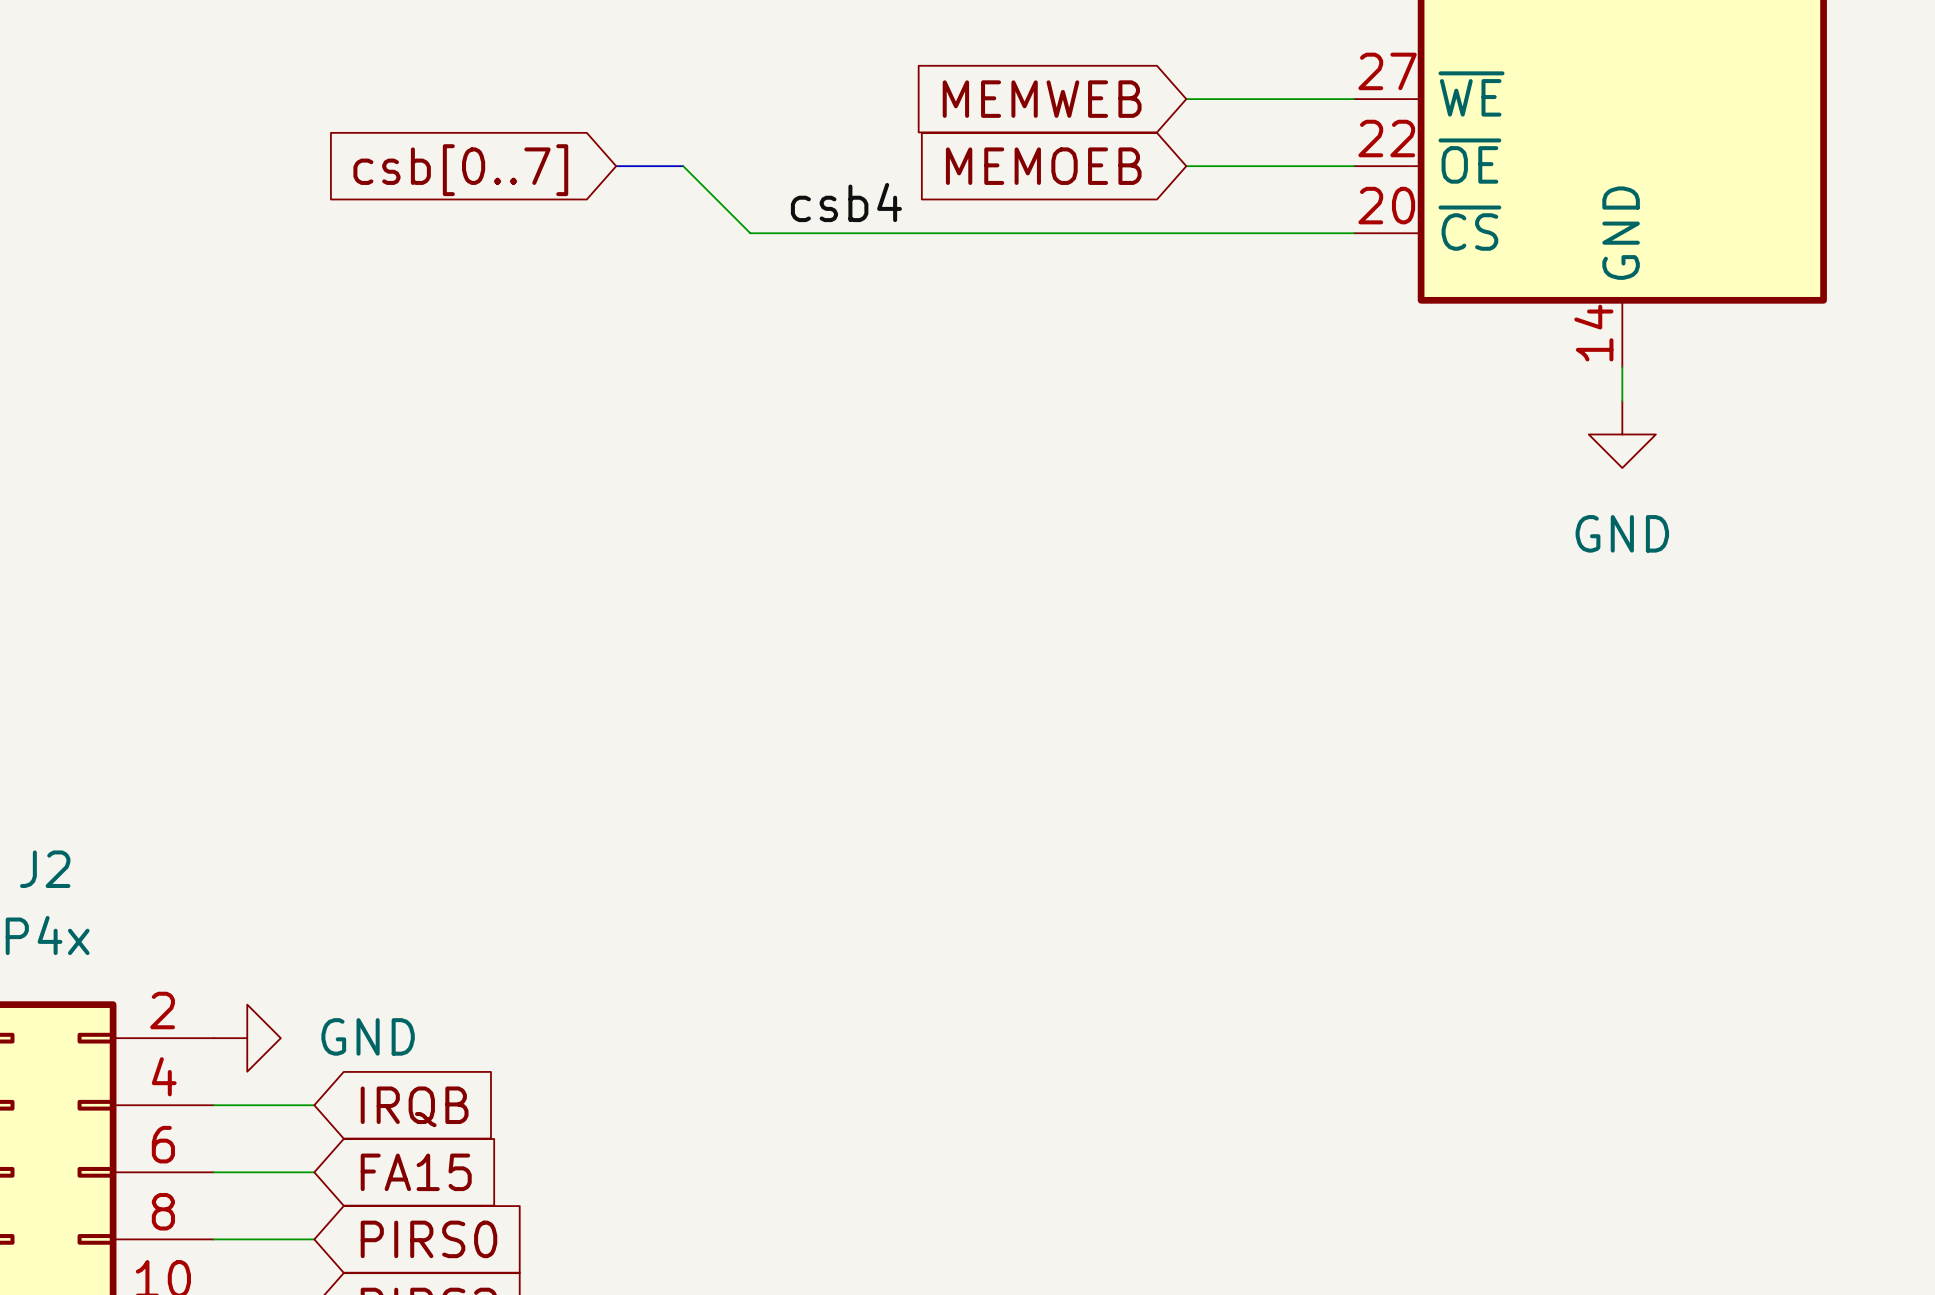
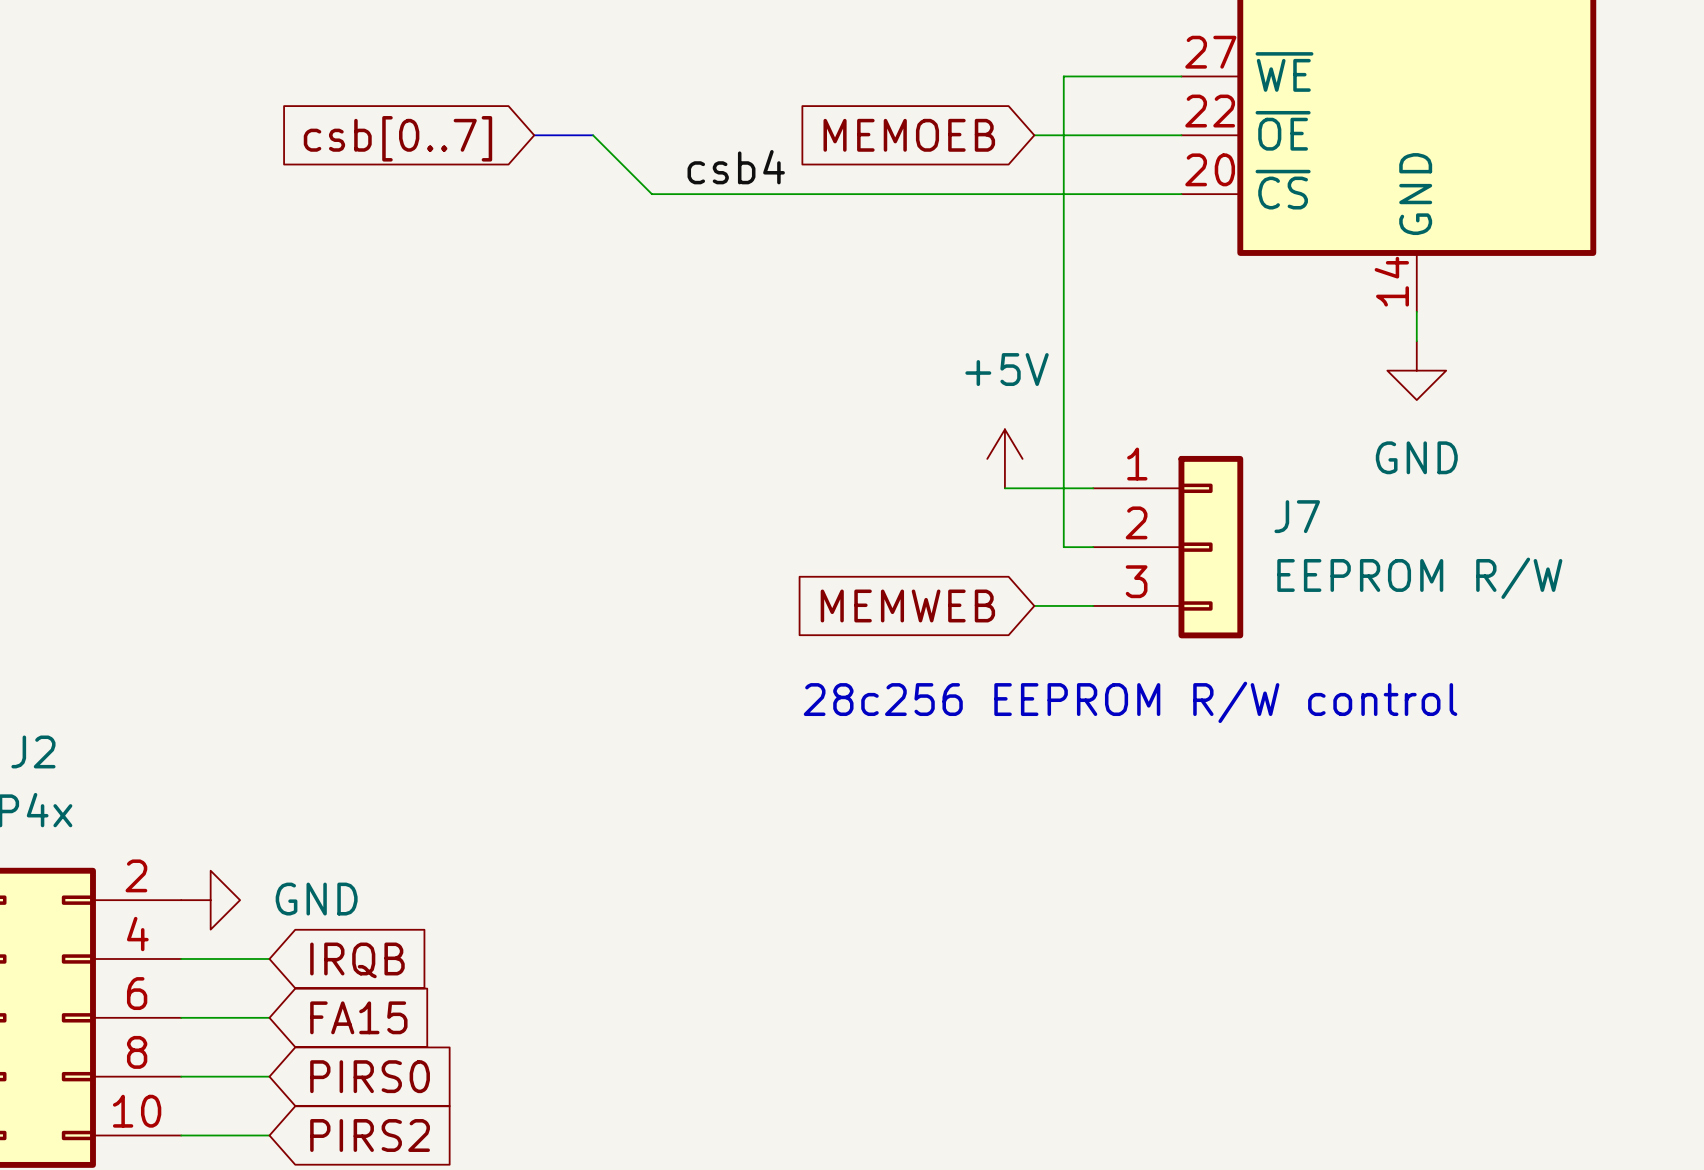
global label position: MEMWEB (1042, 99) -> MEMWEB (907, 605)
wire: (1186, 99) (1219, 99) -> (1093, 547) (1063, 547) (1063, 76)
power symbol: none -> +5V (1004, 458)
wire: none -> (1004, 488) (1093, 488)
J7: none -> EEPROM R/W (1168, 547)
wire: none -> (1034, 605) (1093, 605)
text: none -> 28c256 EEPROM R/W control (1130, 702)

